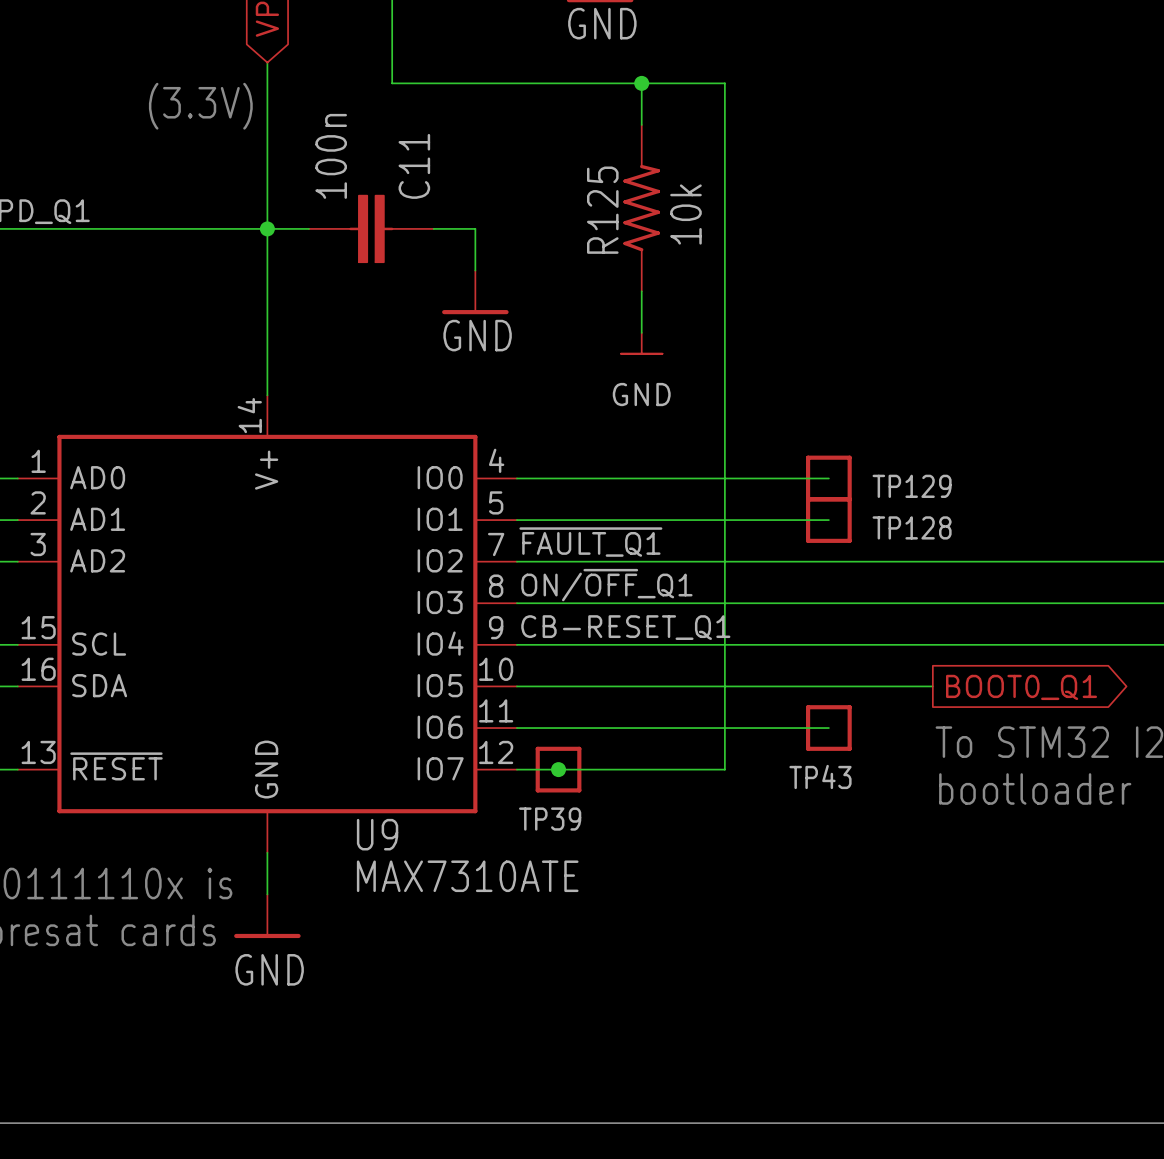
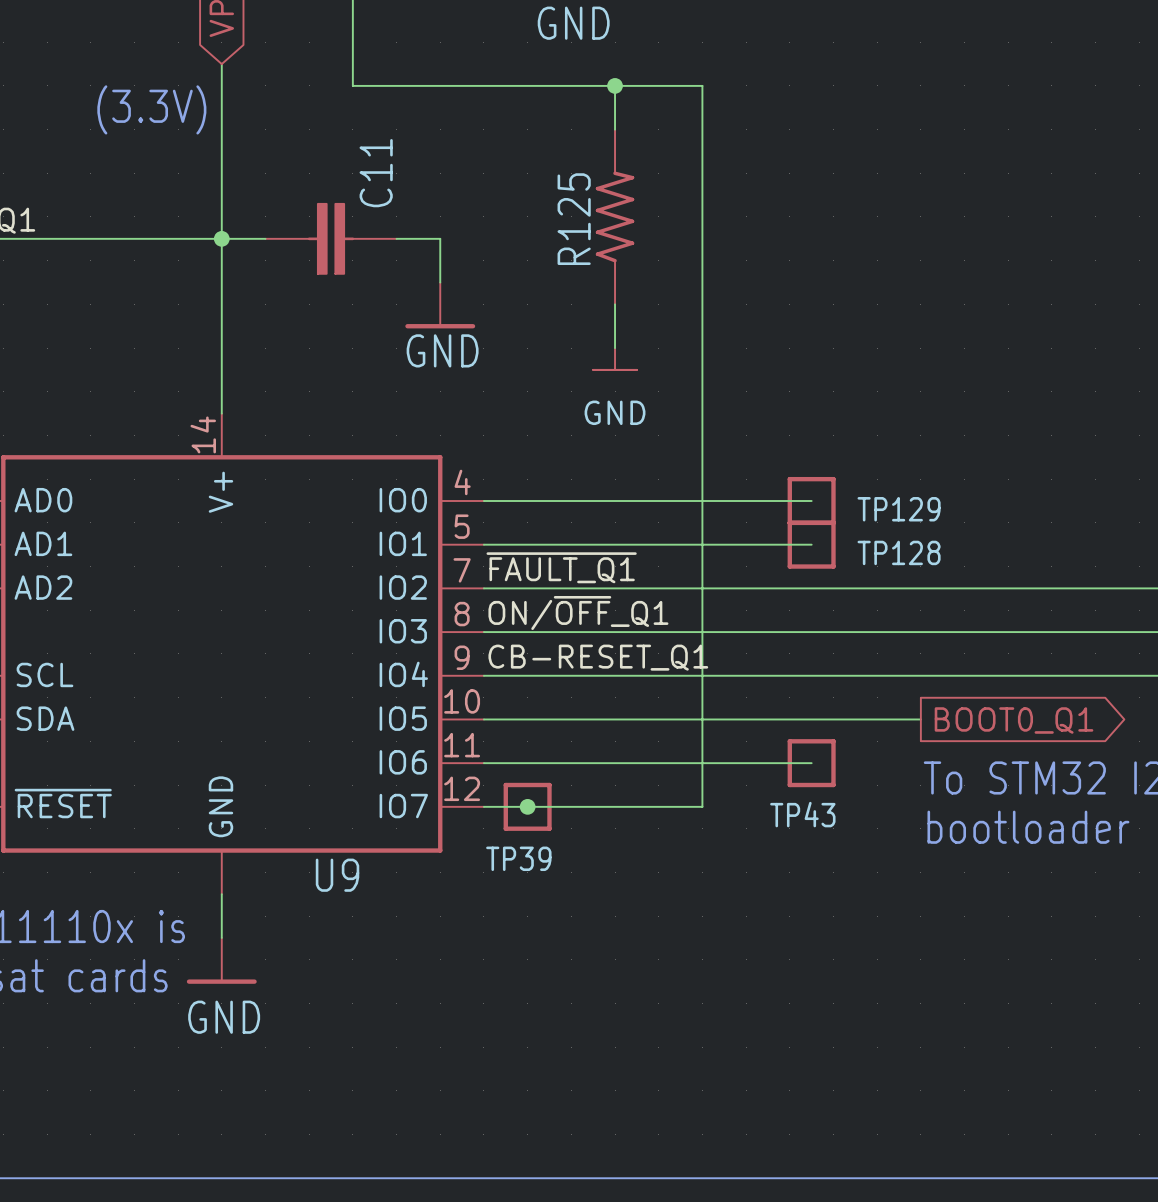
C11 value: 100n (331, 156) -> none
R125 value: 10k (685, 214) -> none
U9 value: MAX7310ATE (467, 876) -> none

